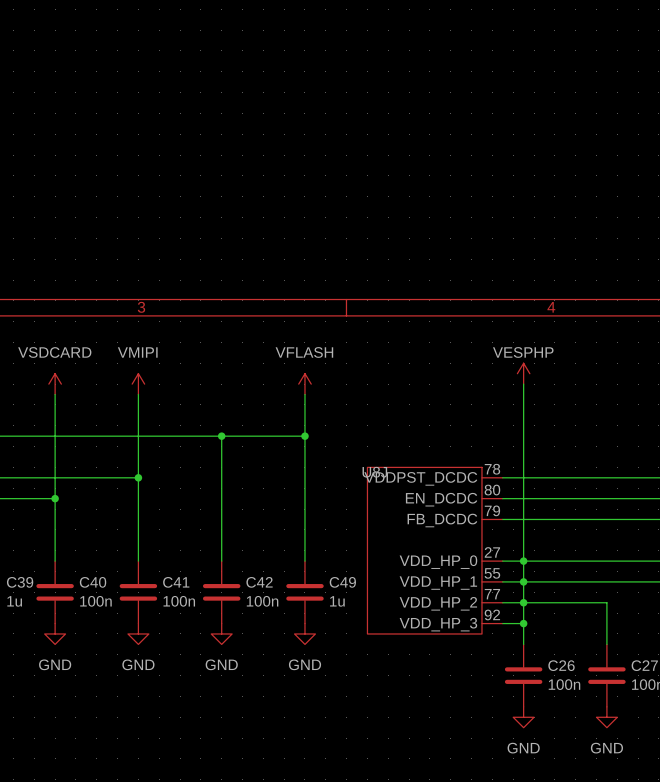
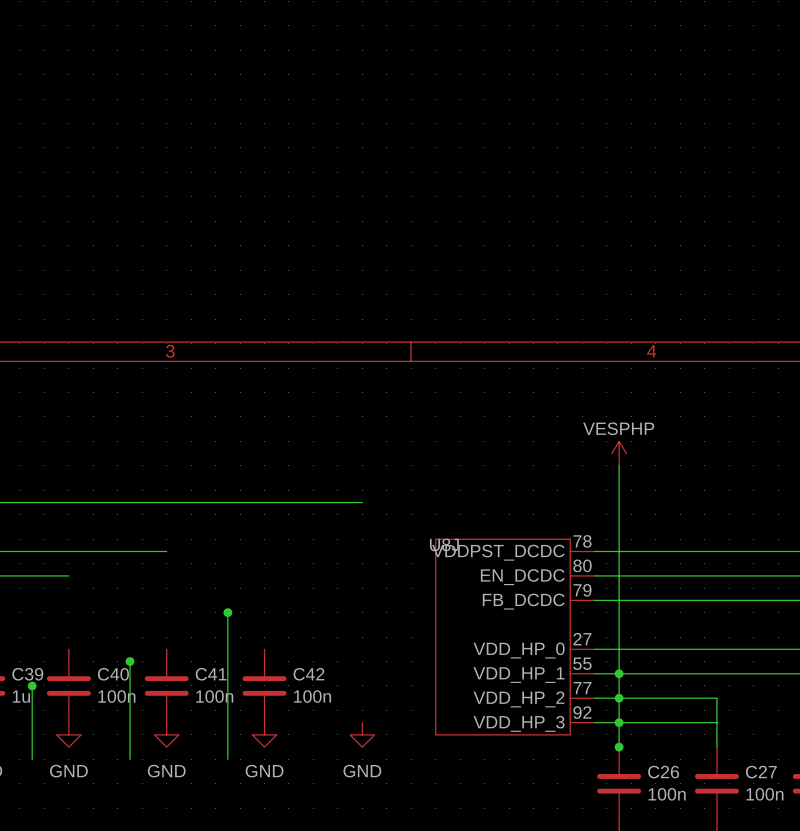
power symbol position: VESPHP (523, 373) -> VESPHP (619, 453)
power symbol: VSDCARD (55, 384) -> none
power symbol: VMIPI (138, 384) -> none
power symbol: VFLASH (304, 384) -> none
wire: (55, 394) (55, 561) -> none
wire: (138, 394) (138, 561) -> none
wire: (304, 394) (304, 561) -> none
wire: (221, 436) (221, 561) -> (227, 612) (227, 759)
junction: (221, 436) -> none
junction: (304, 436) -> none
junction: (138, 477) -> none
junction: (55, 498) -> none
junction: none -> (227, 612)
junction: (523, 561) -> none
wire: none -> (130, 661) (130, 759)
junction: none -> (130, 661)
wire: none -> (32, 685) (32, 759)
junction: none -> (32, 685)
C49: 1u (304, 592) -> none
wire: none -> (619, 722) (716, 722)
junction: none -> (619, 747)

